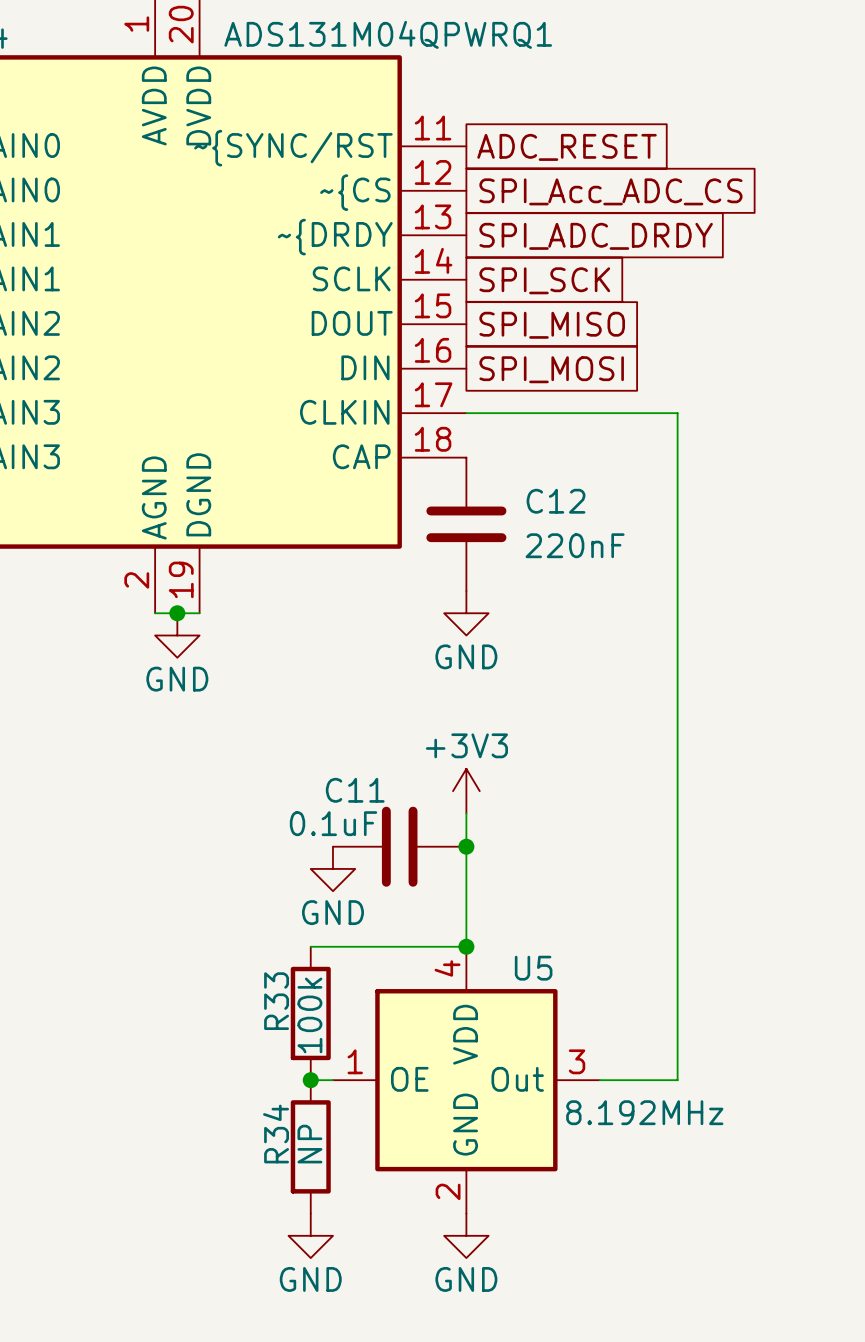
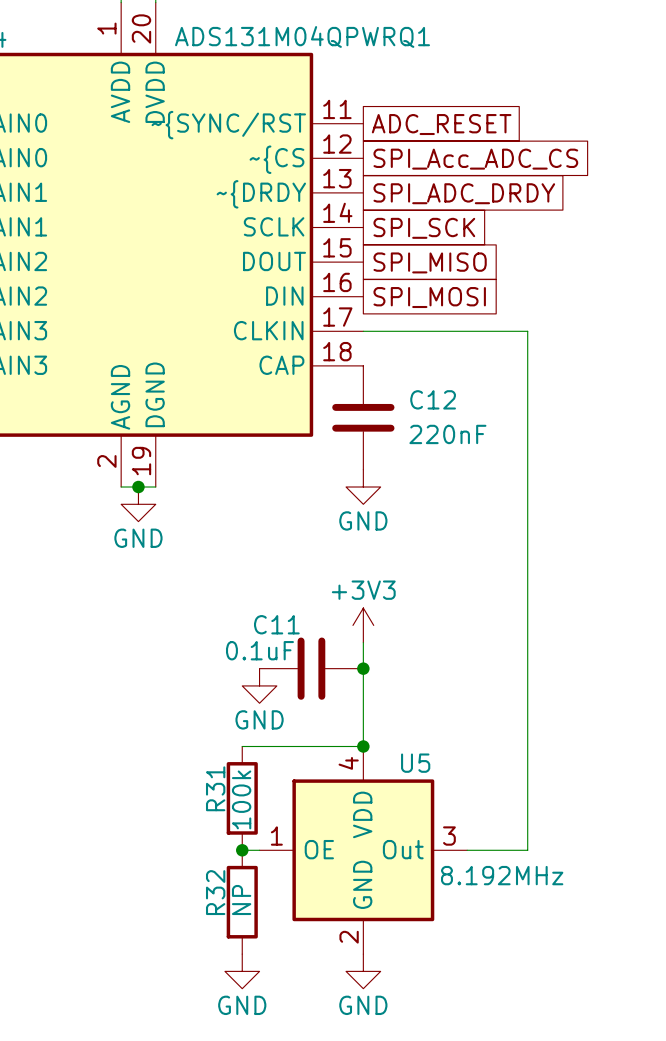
R33 name: R33 (276, 1001) -> R31 (215, 788)
R34 name: R34 (276, 1134) -> R32 (215, 892)

